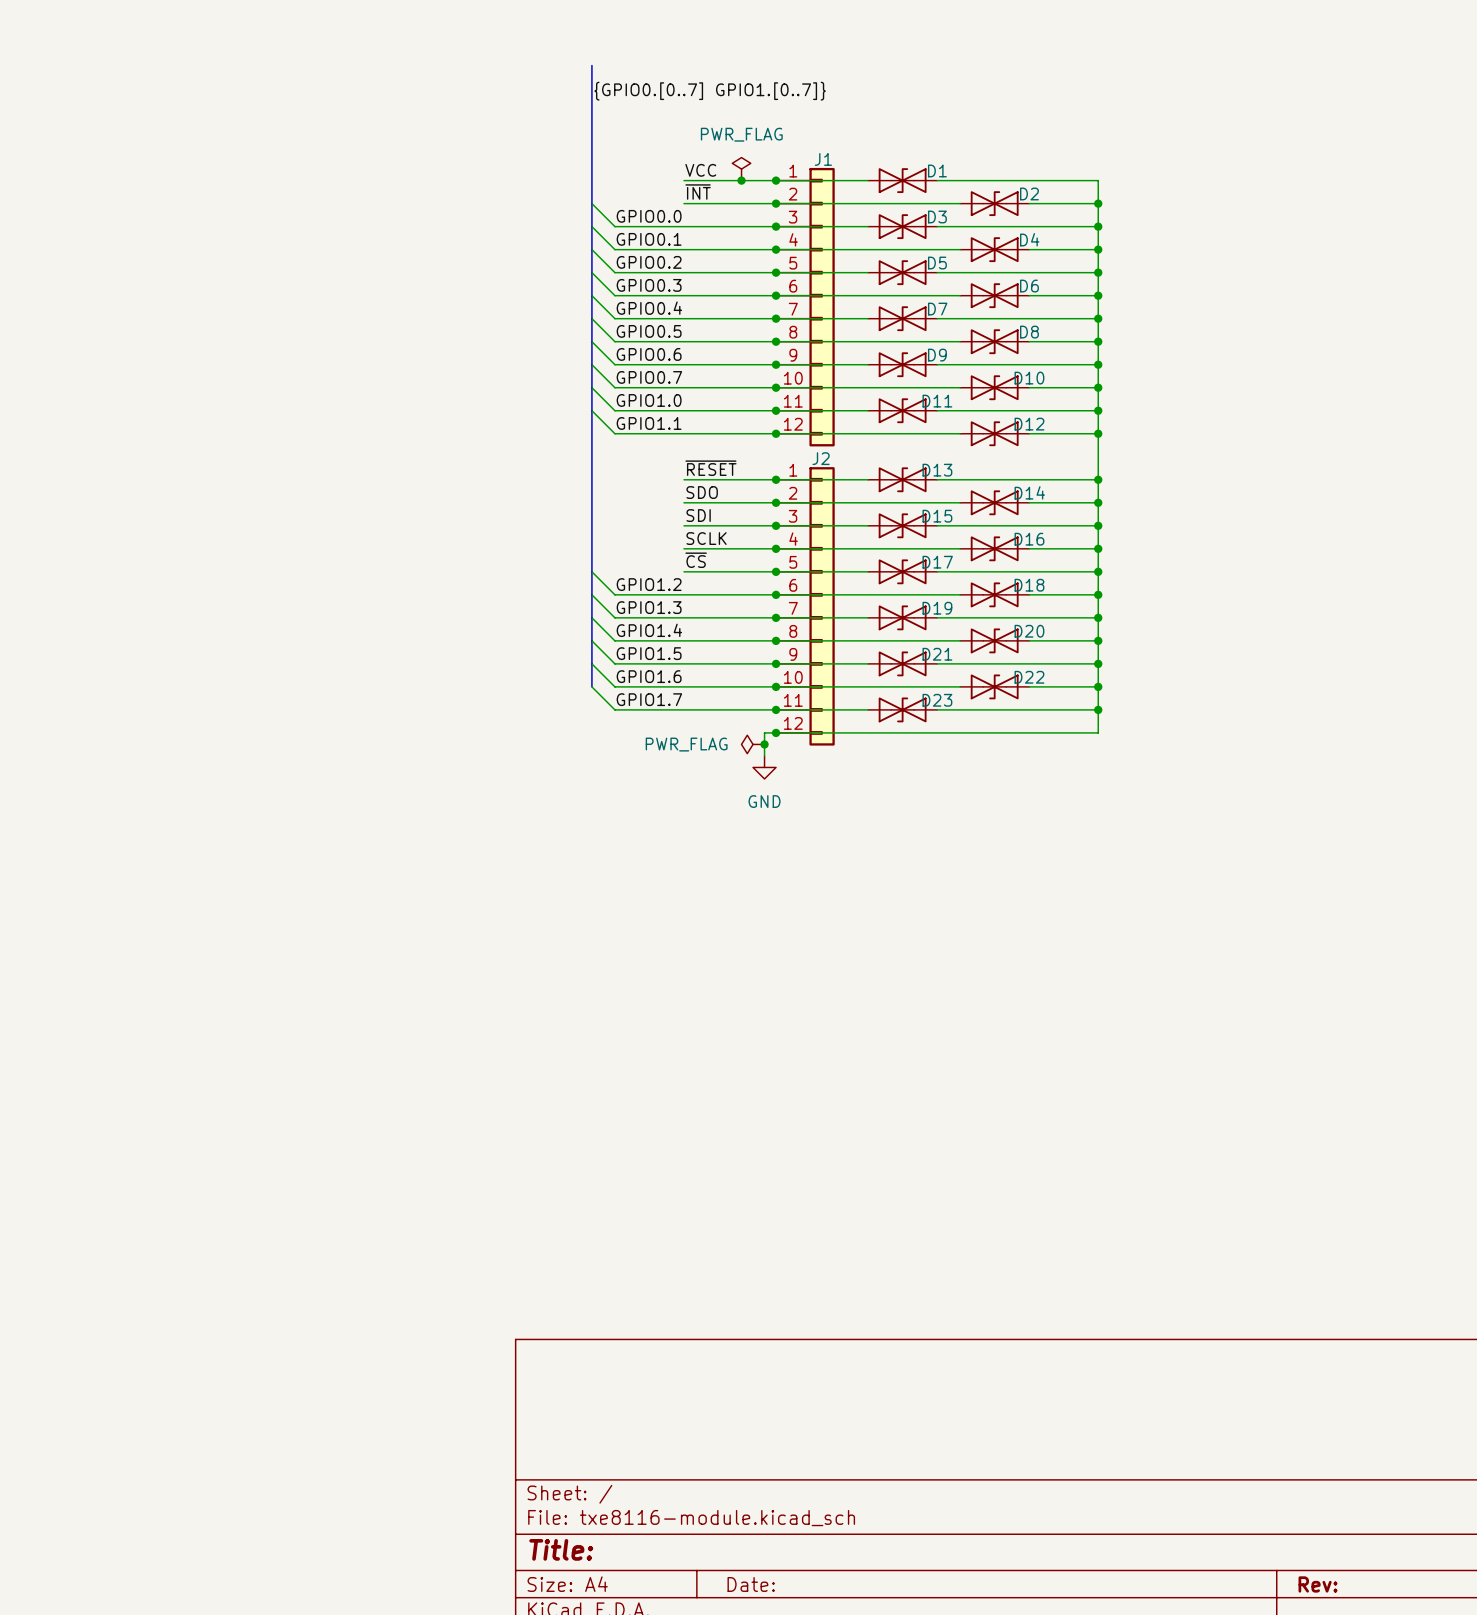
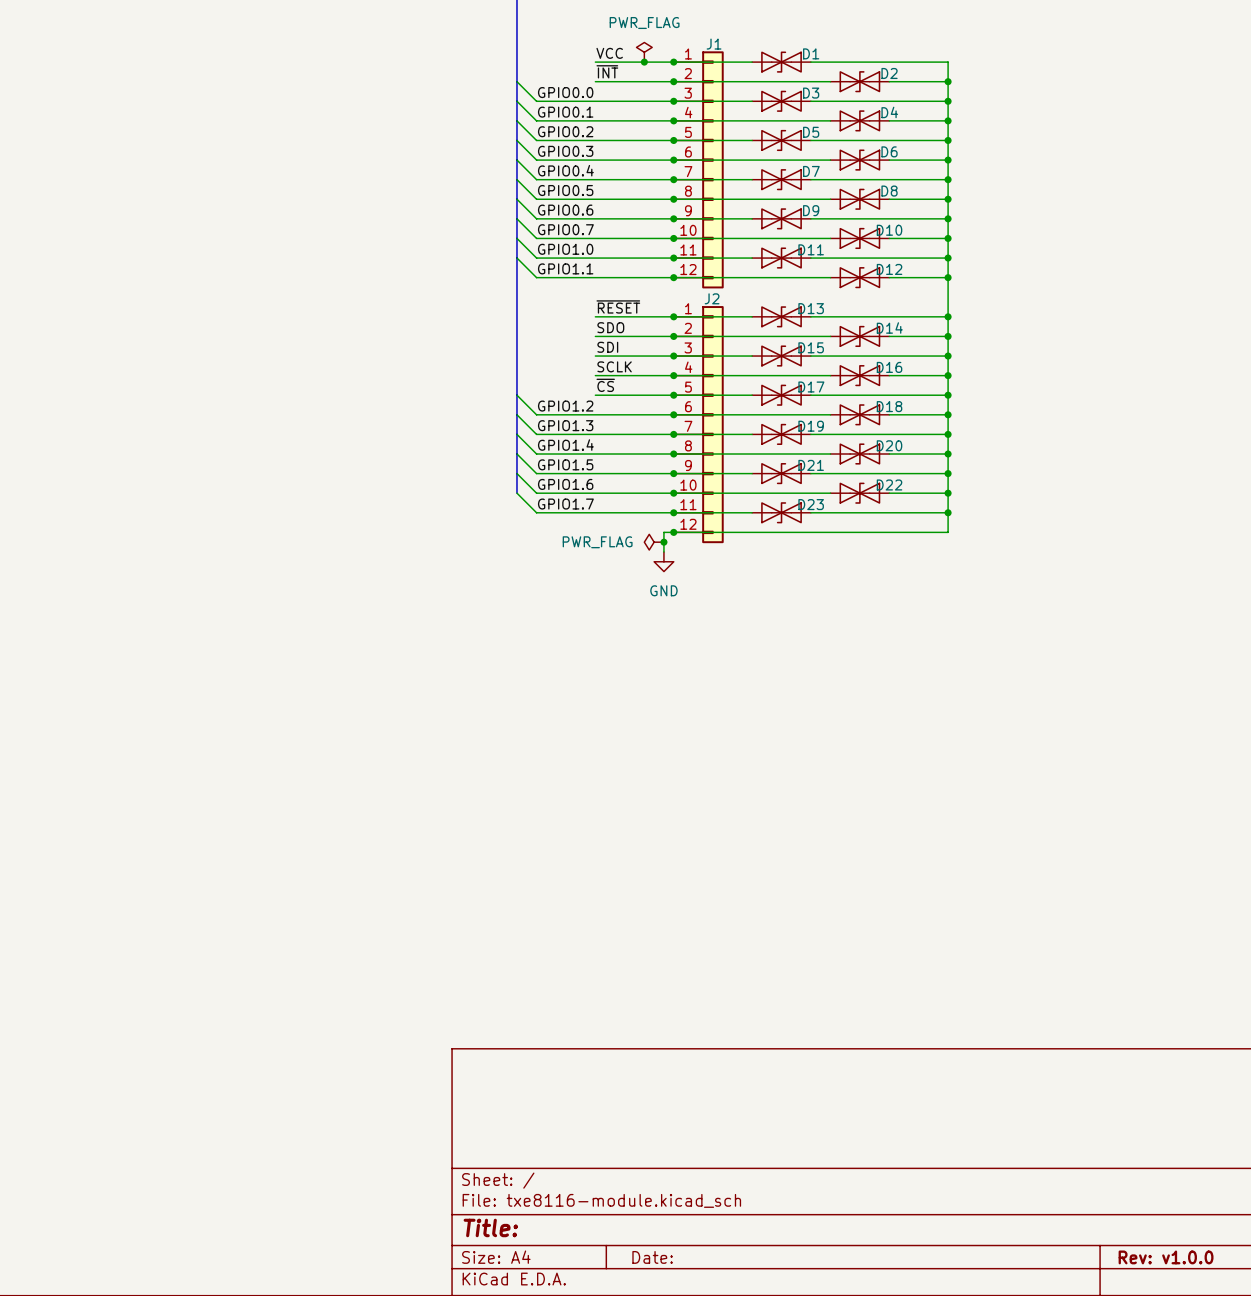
title block: Rev: (1318, 1584) -> Rev: v1.0.0 (1166, 1257)

